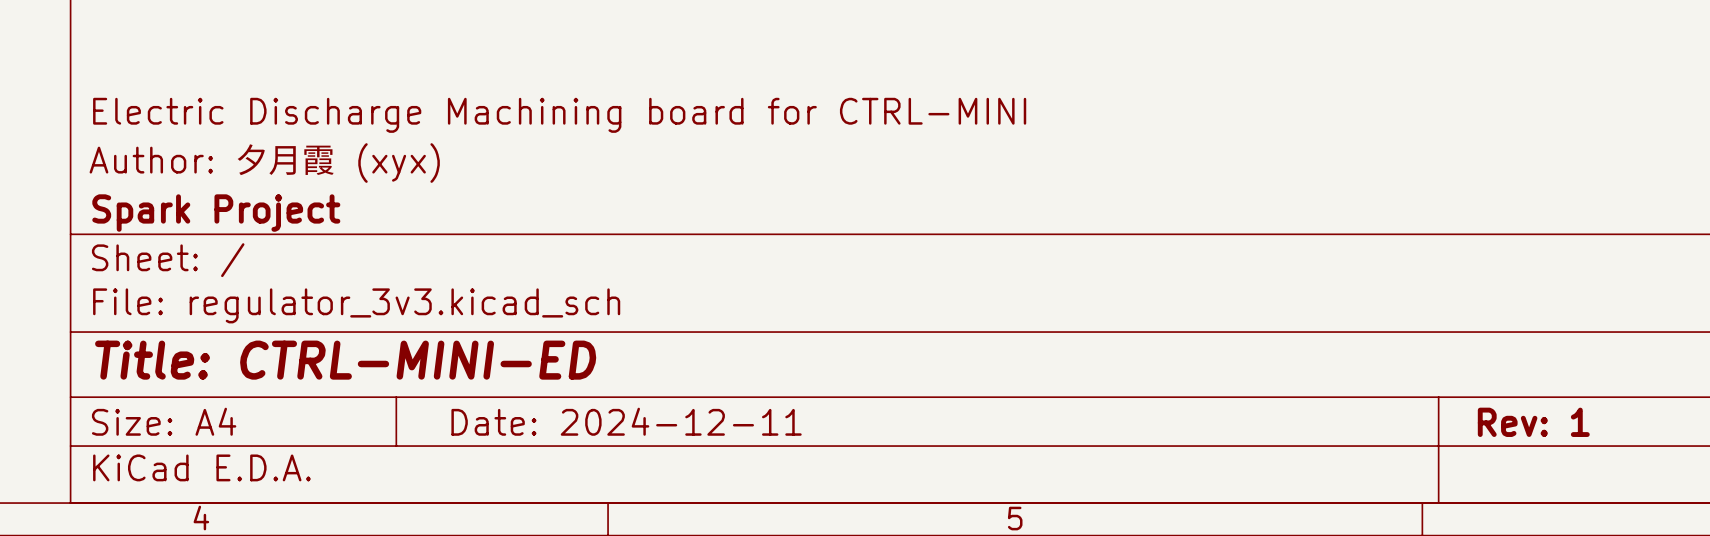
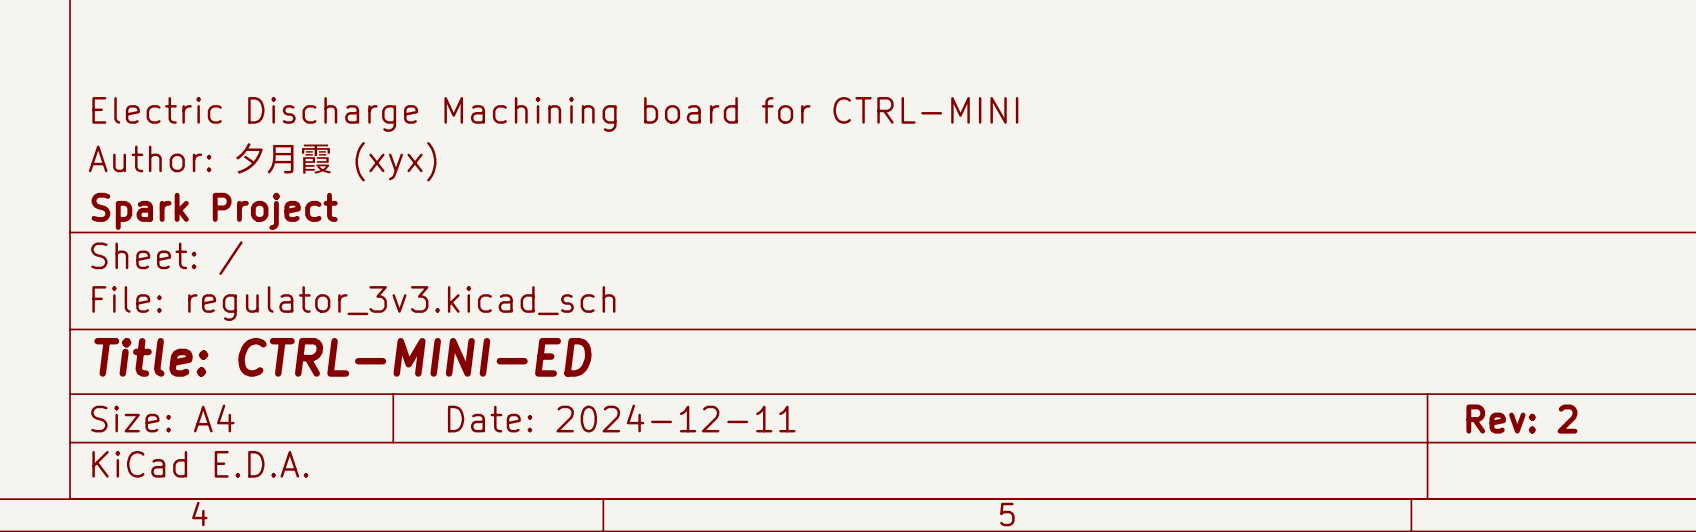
title block: Rev: 1 (1533, 422) -> Rev: 2 (1521, 419)

